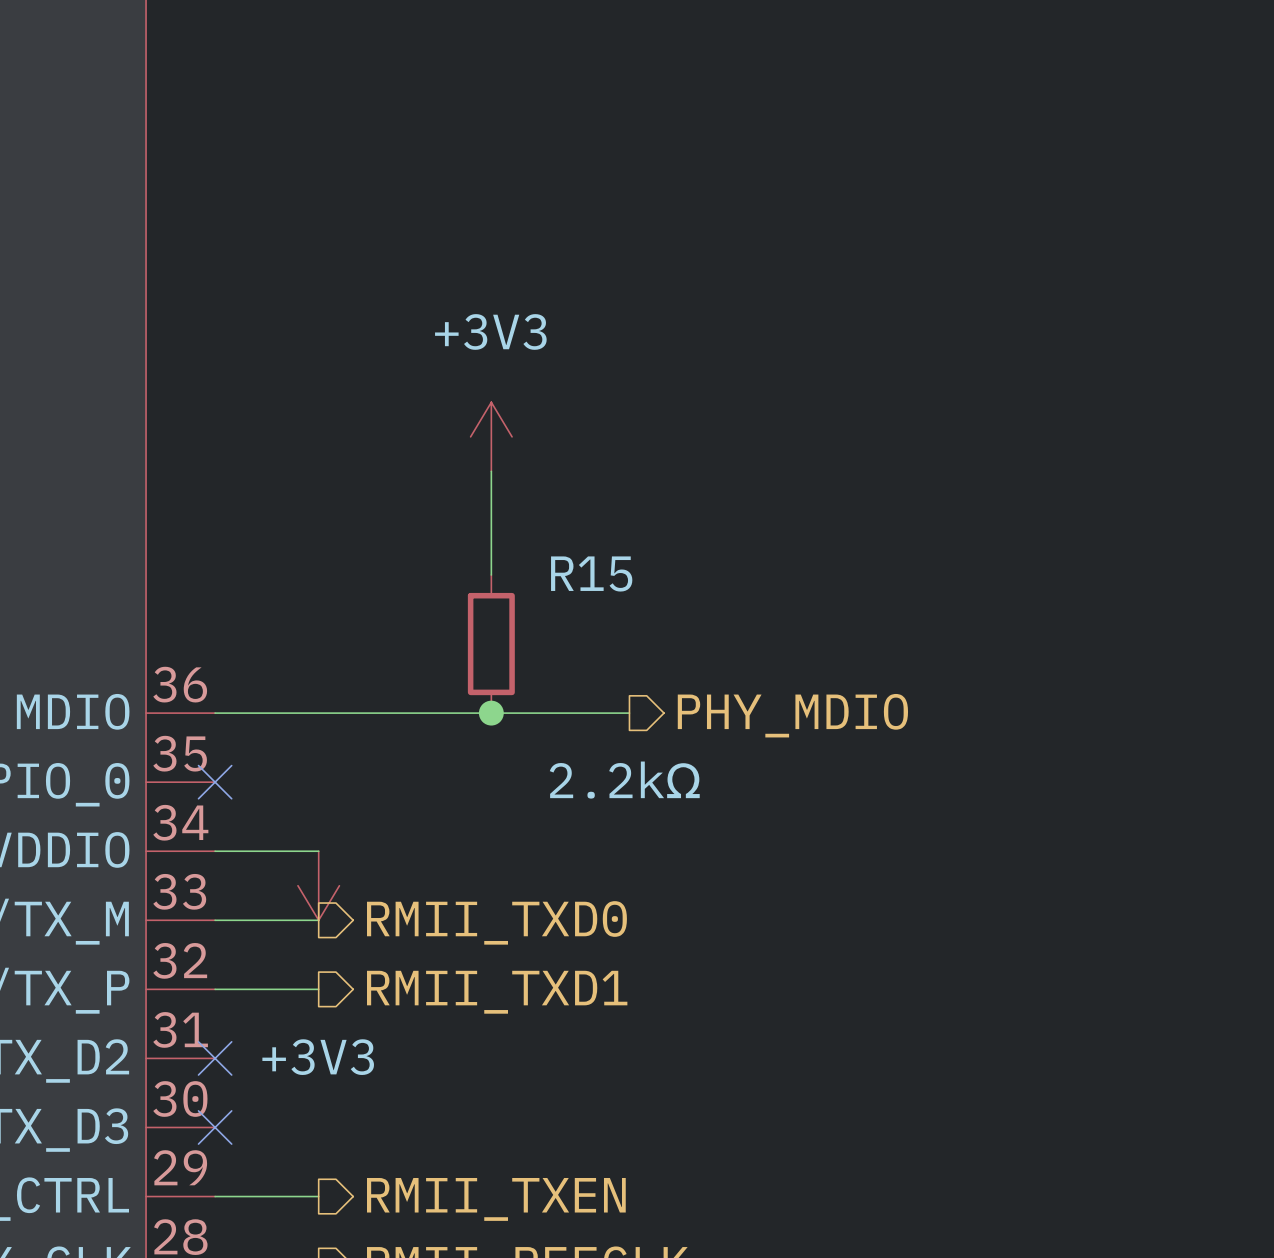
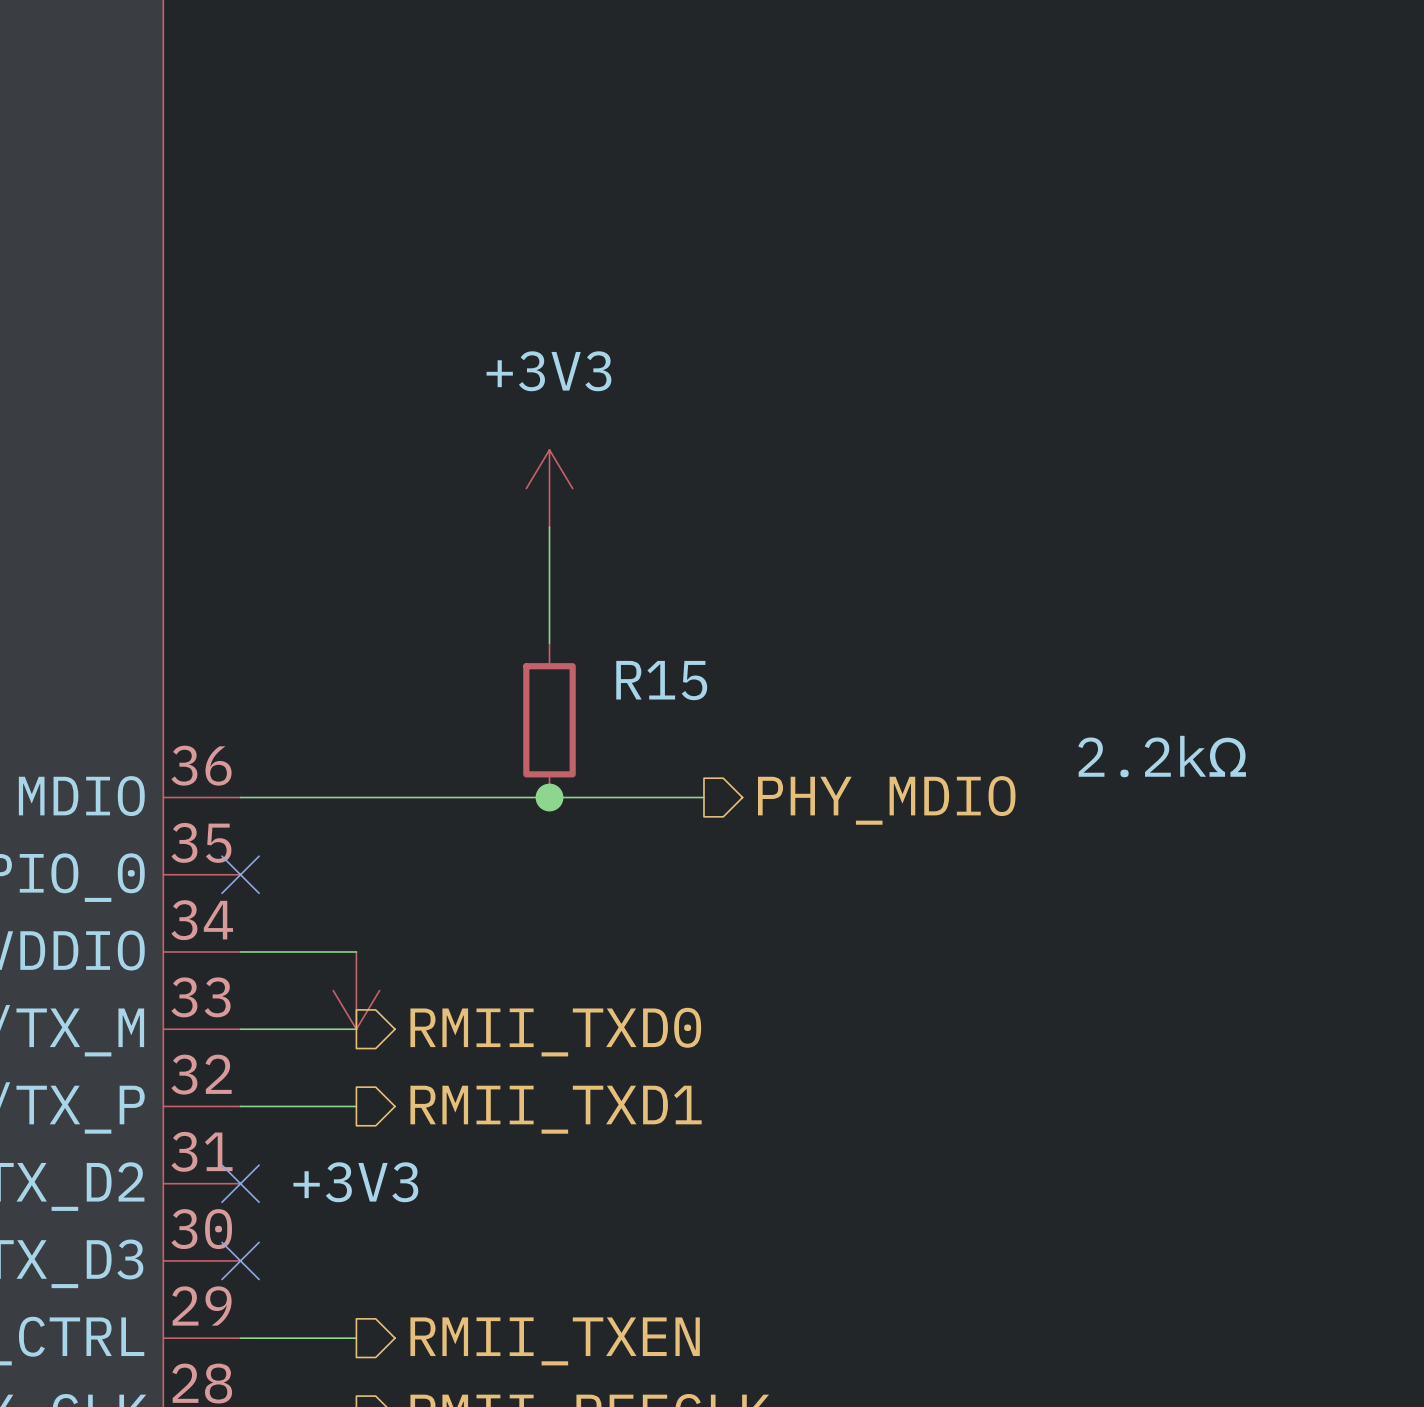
R15 name position: R15 (591, 573) -> R15 (661, 680)
R15 value position: 2.2kΩ (624, 780) -> 2.2kΩ (1162, 756)

